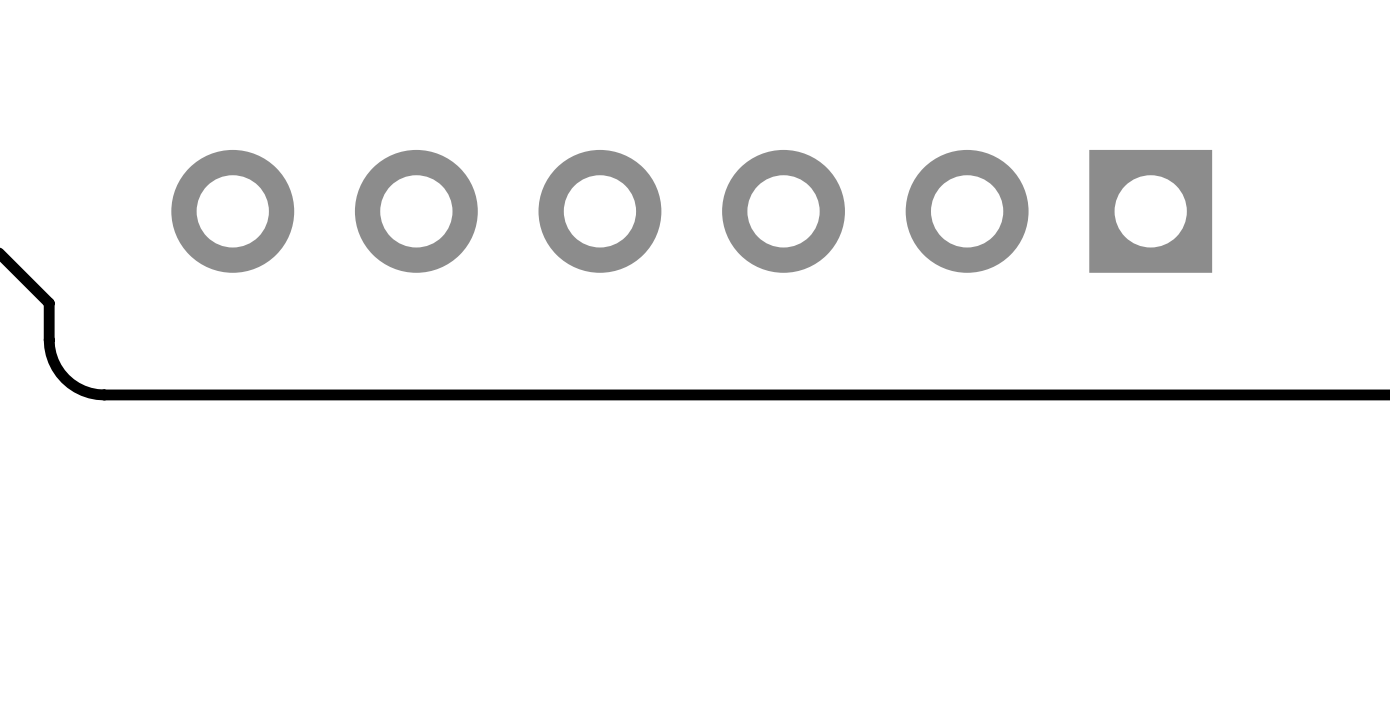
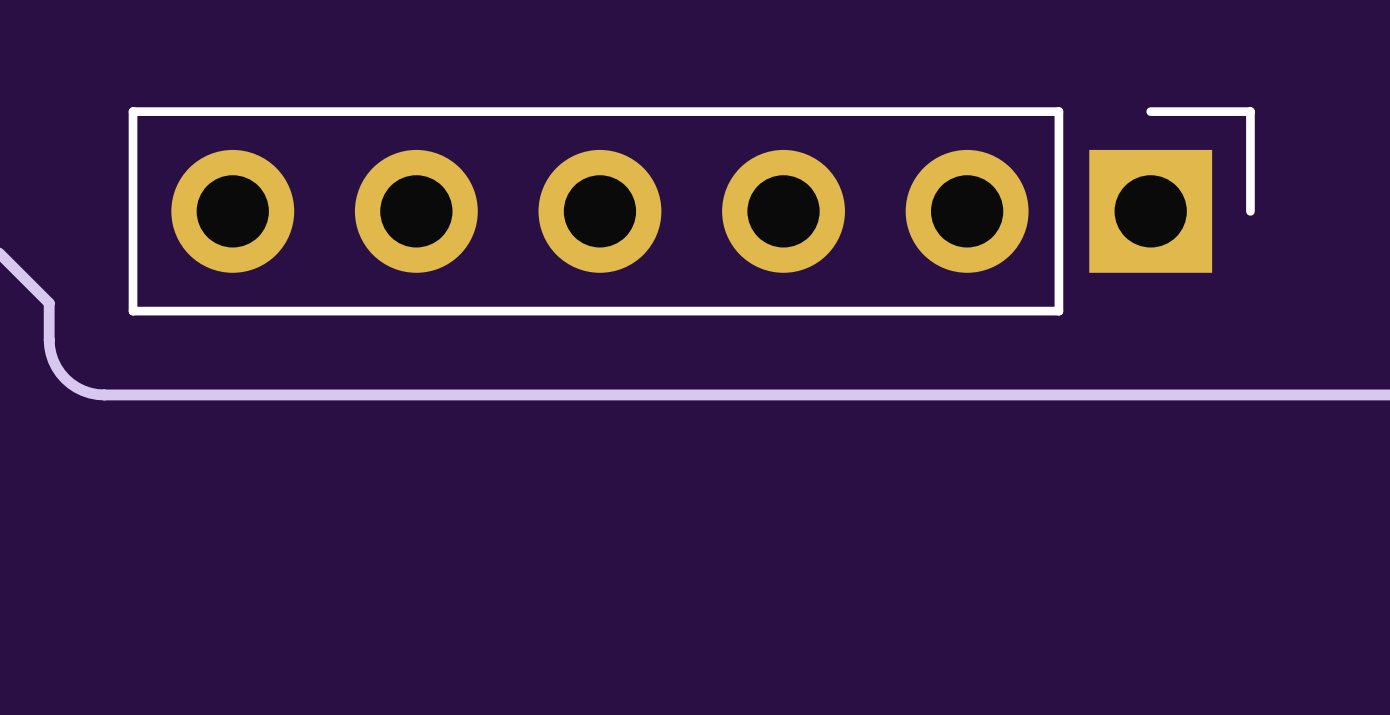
part side: top (691, 211) -> bottom (691, 211)

